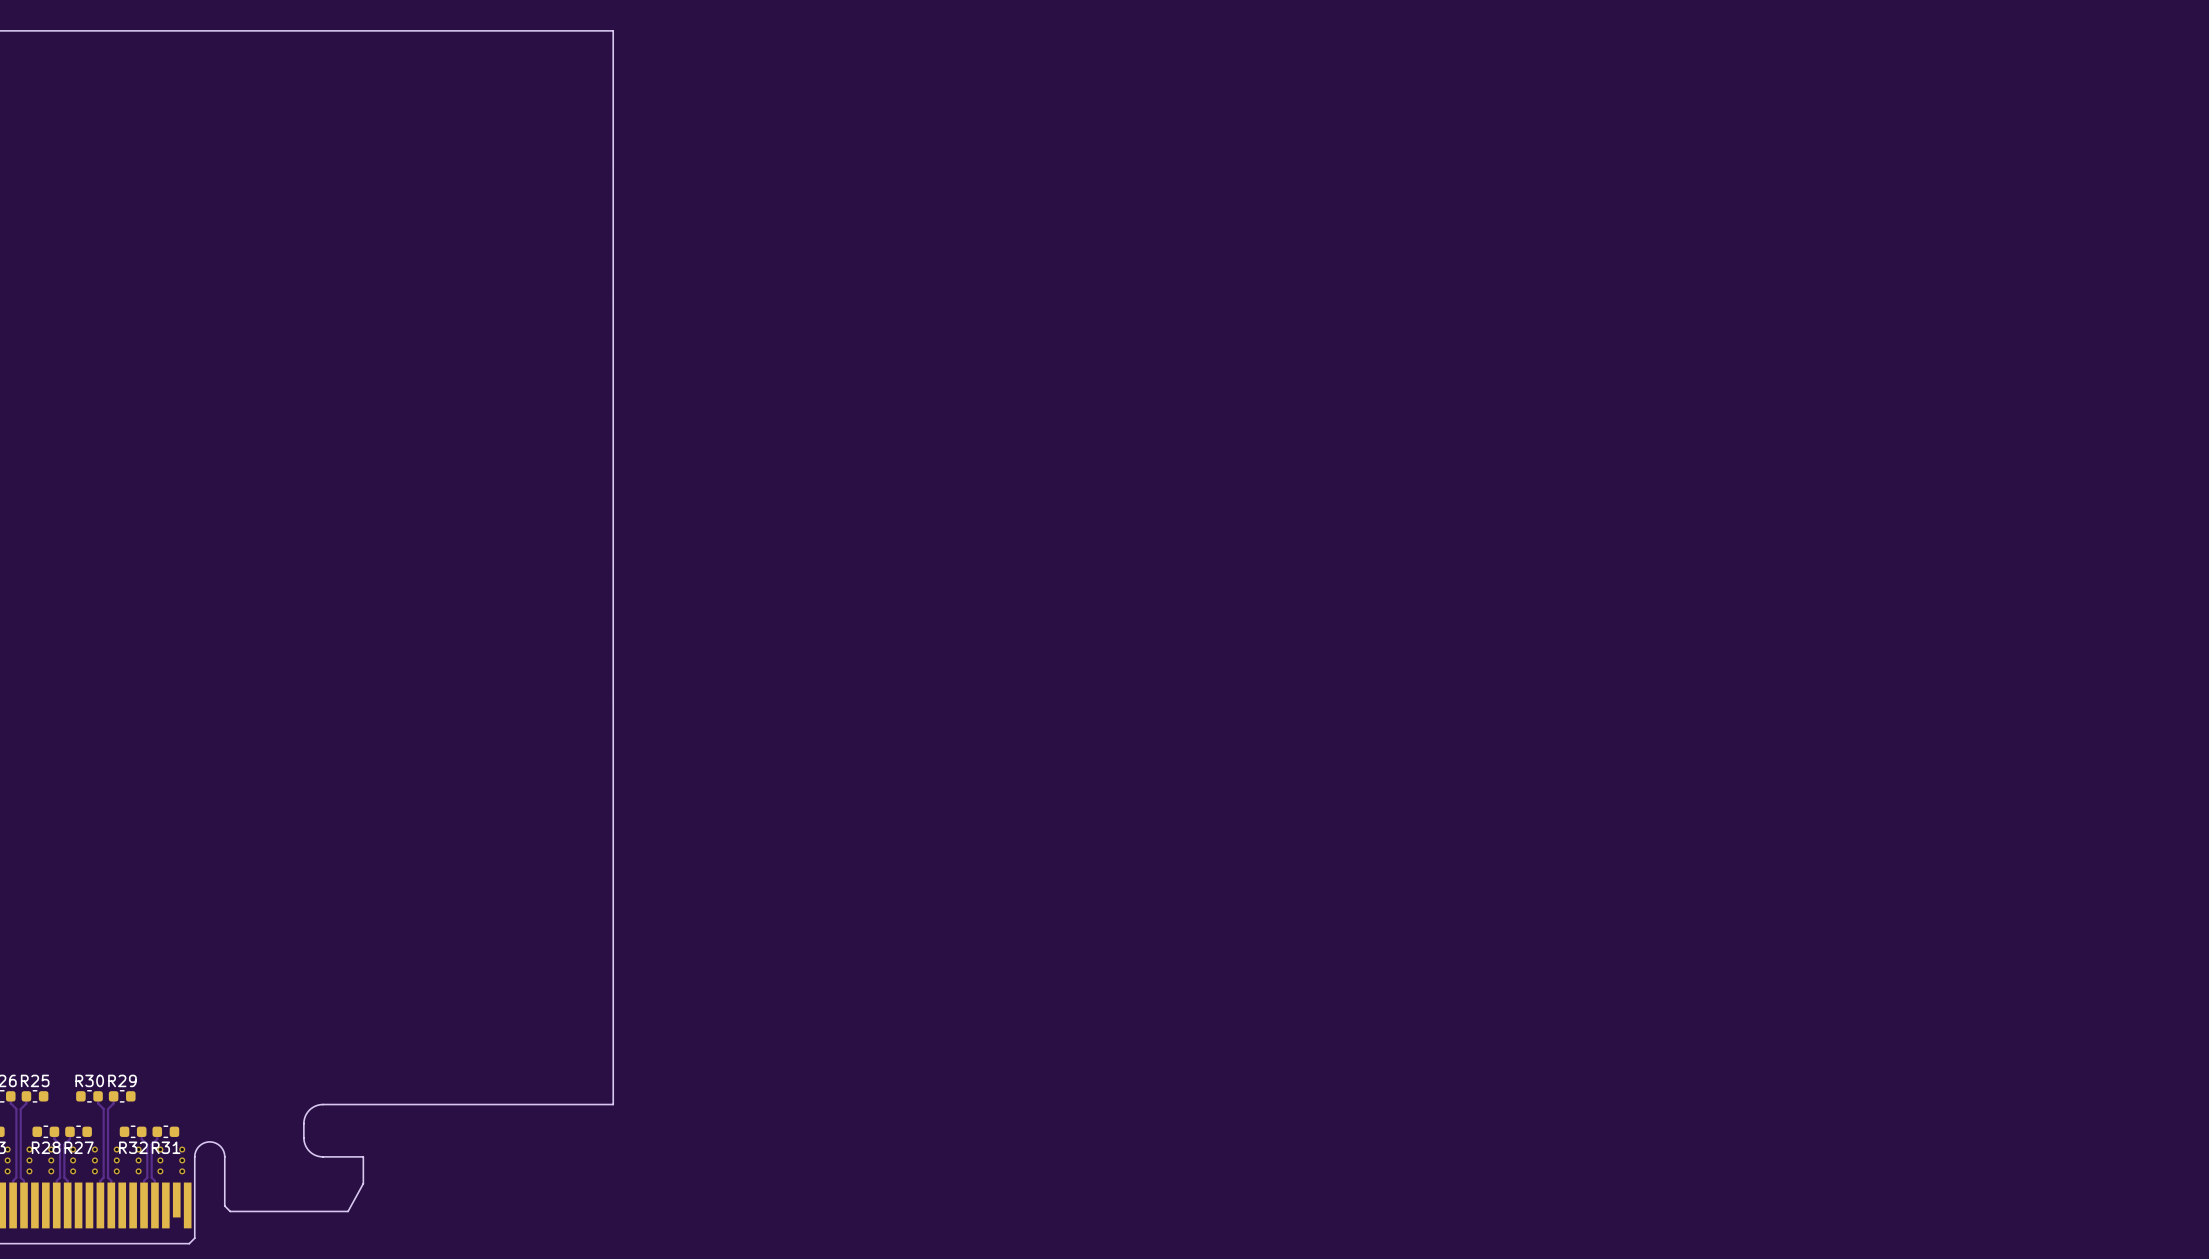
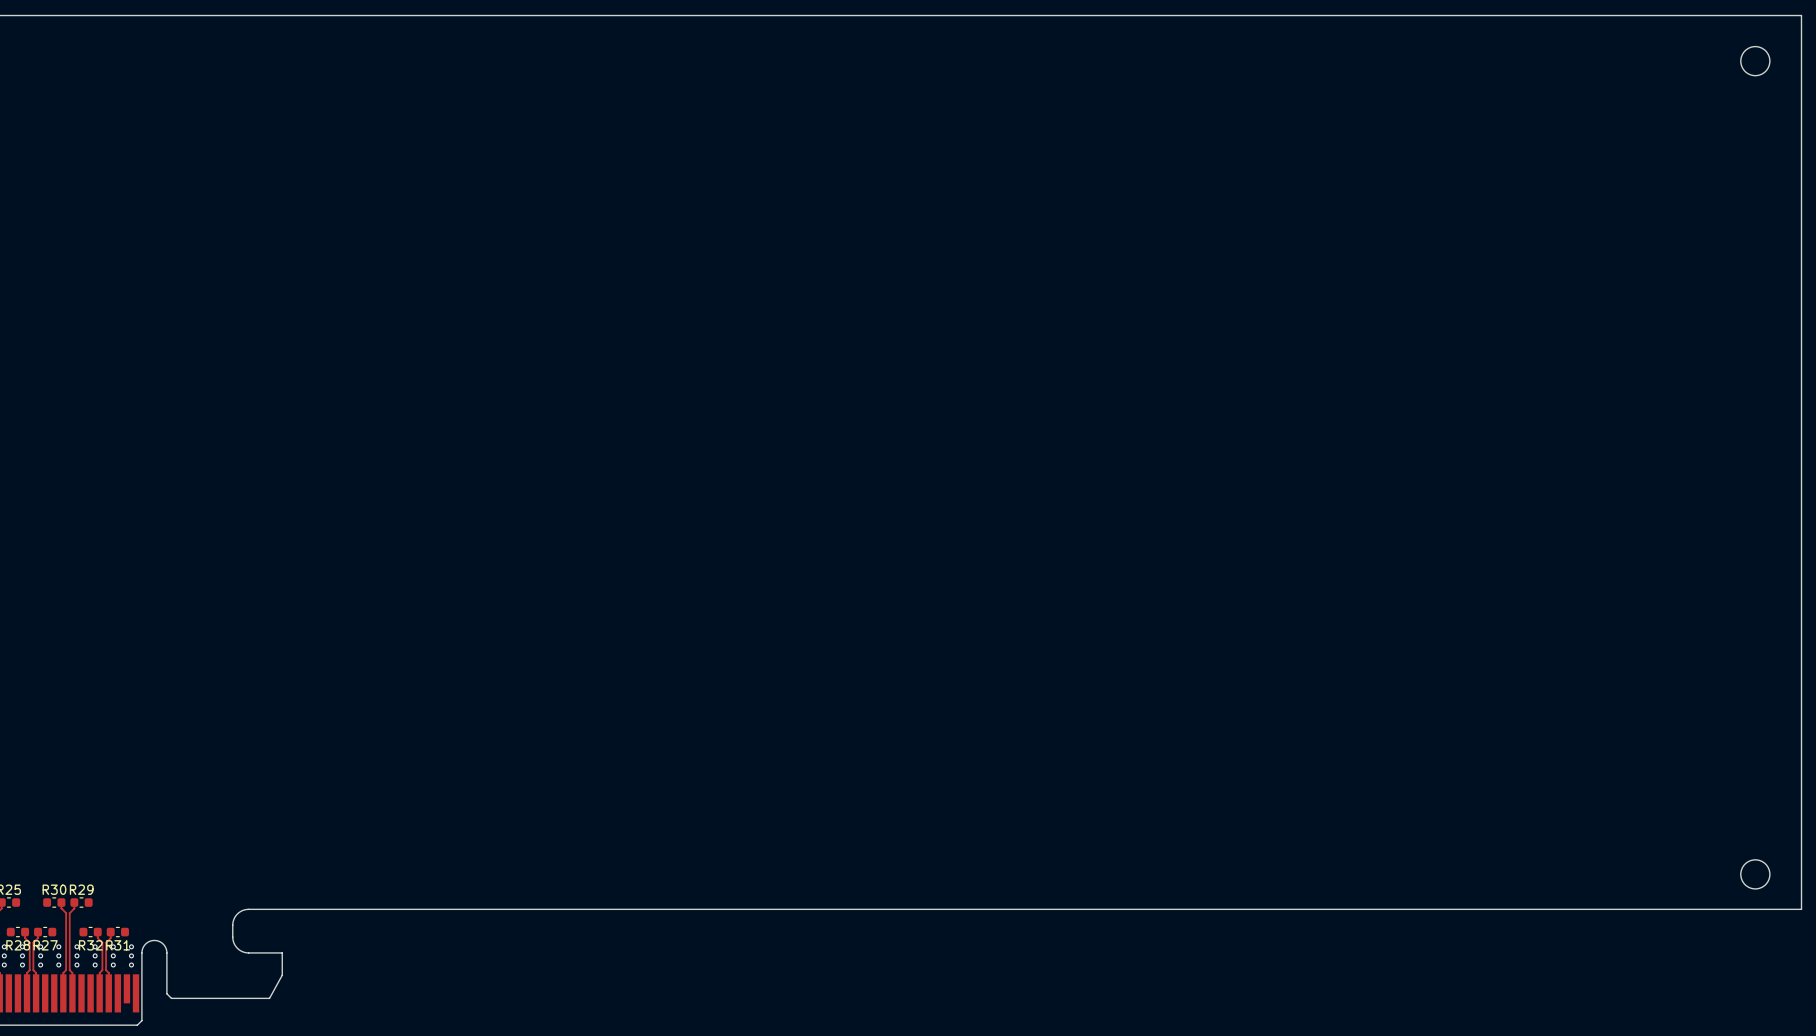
board edge: (613, 30) (613, 1104) -> (490, 15) (1801, 15) (1801, 909) (490, 909)
round board edge: none -> [1740, 45, 1771, 77]
round board edge: none -> [1740, 859, 1771, 890]

